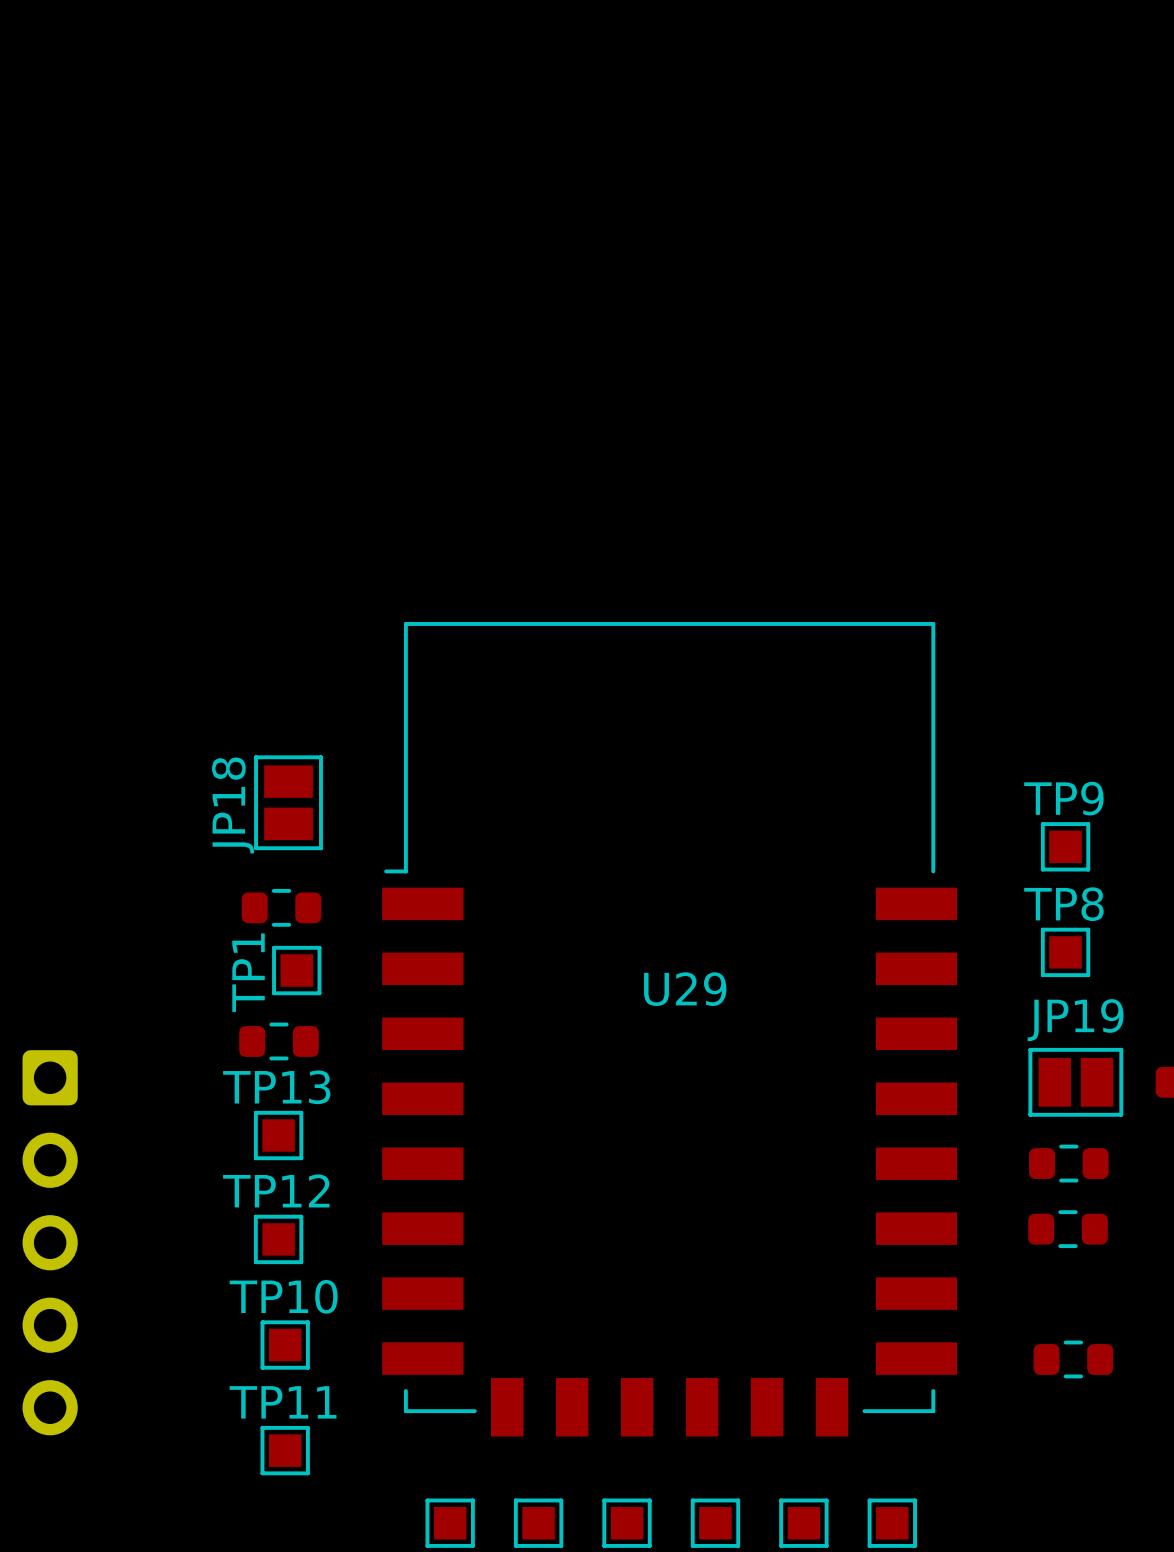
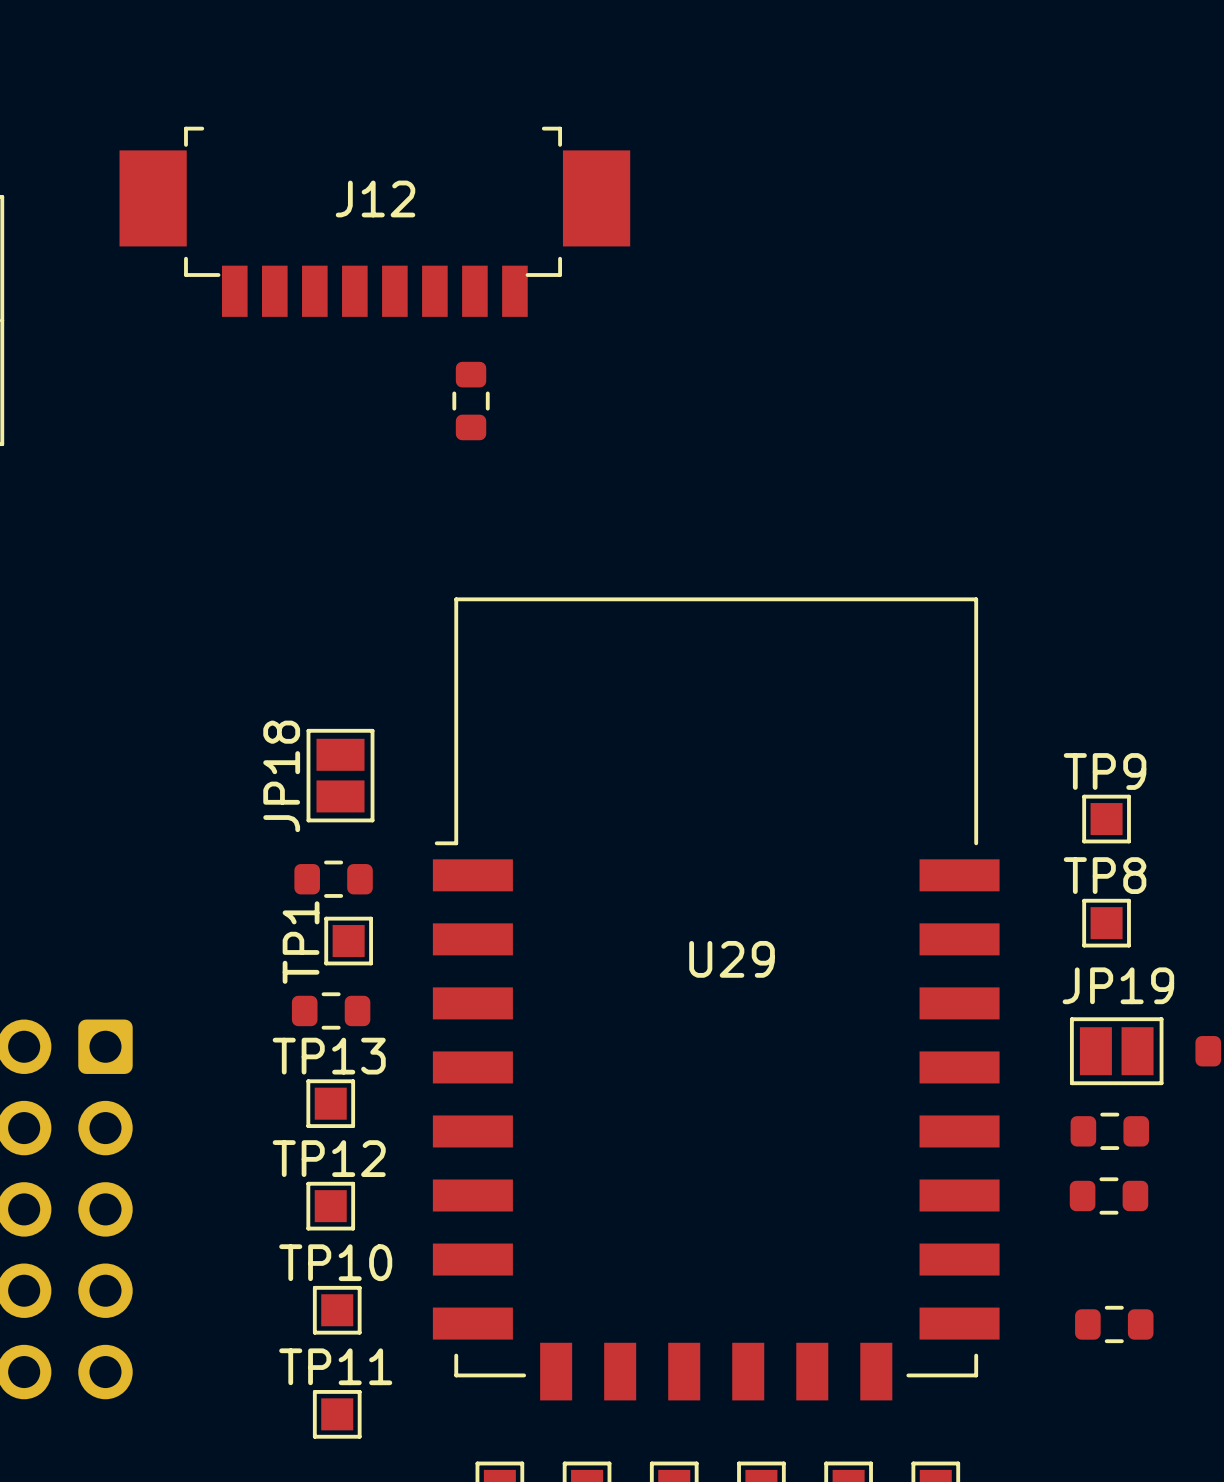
J12: none -> (374, 221)
part: none -> (471, 401)

